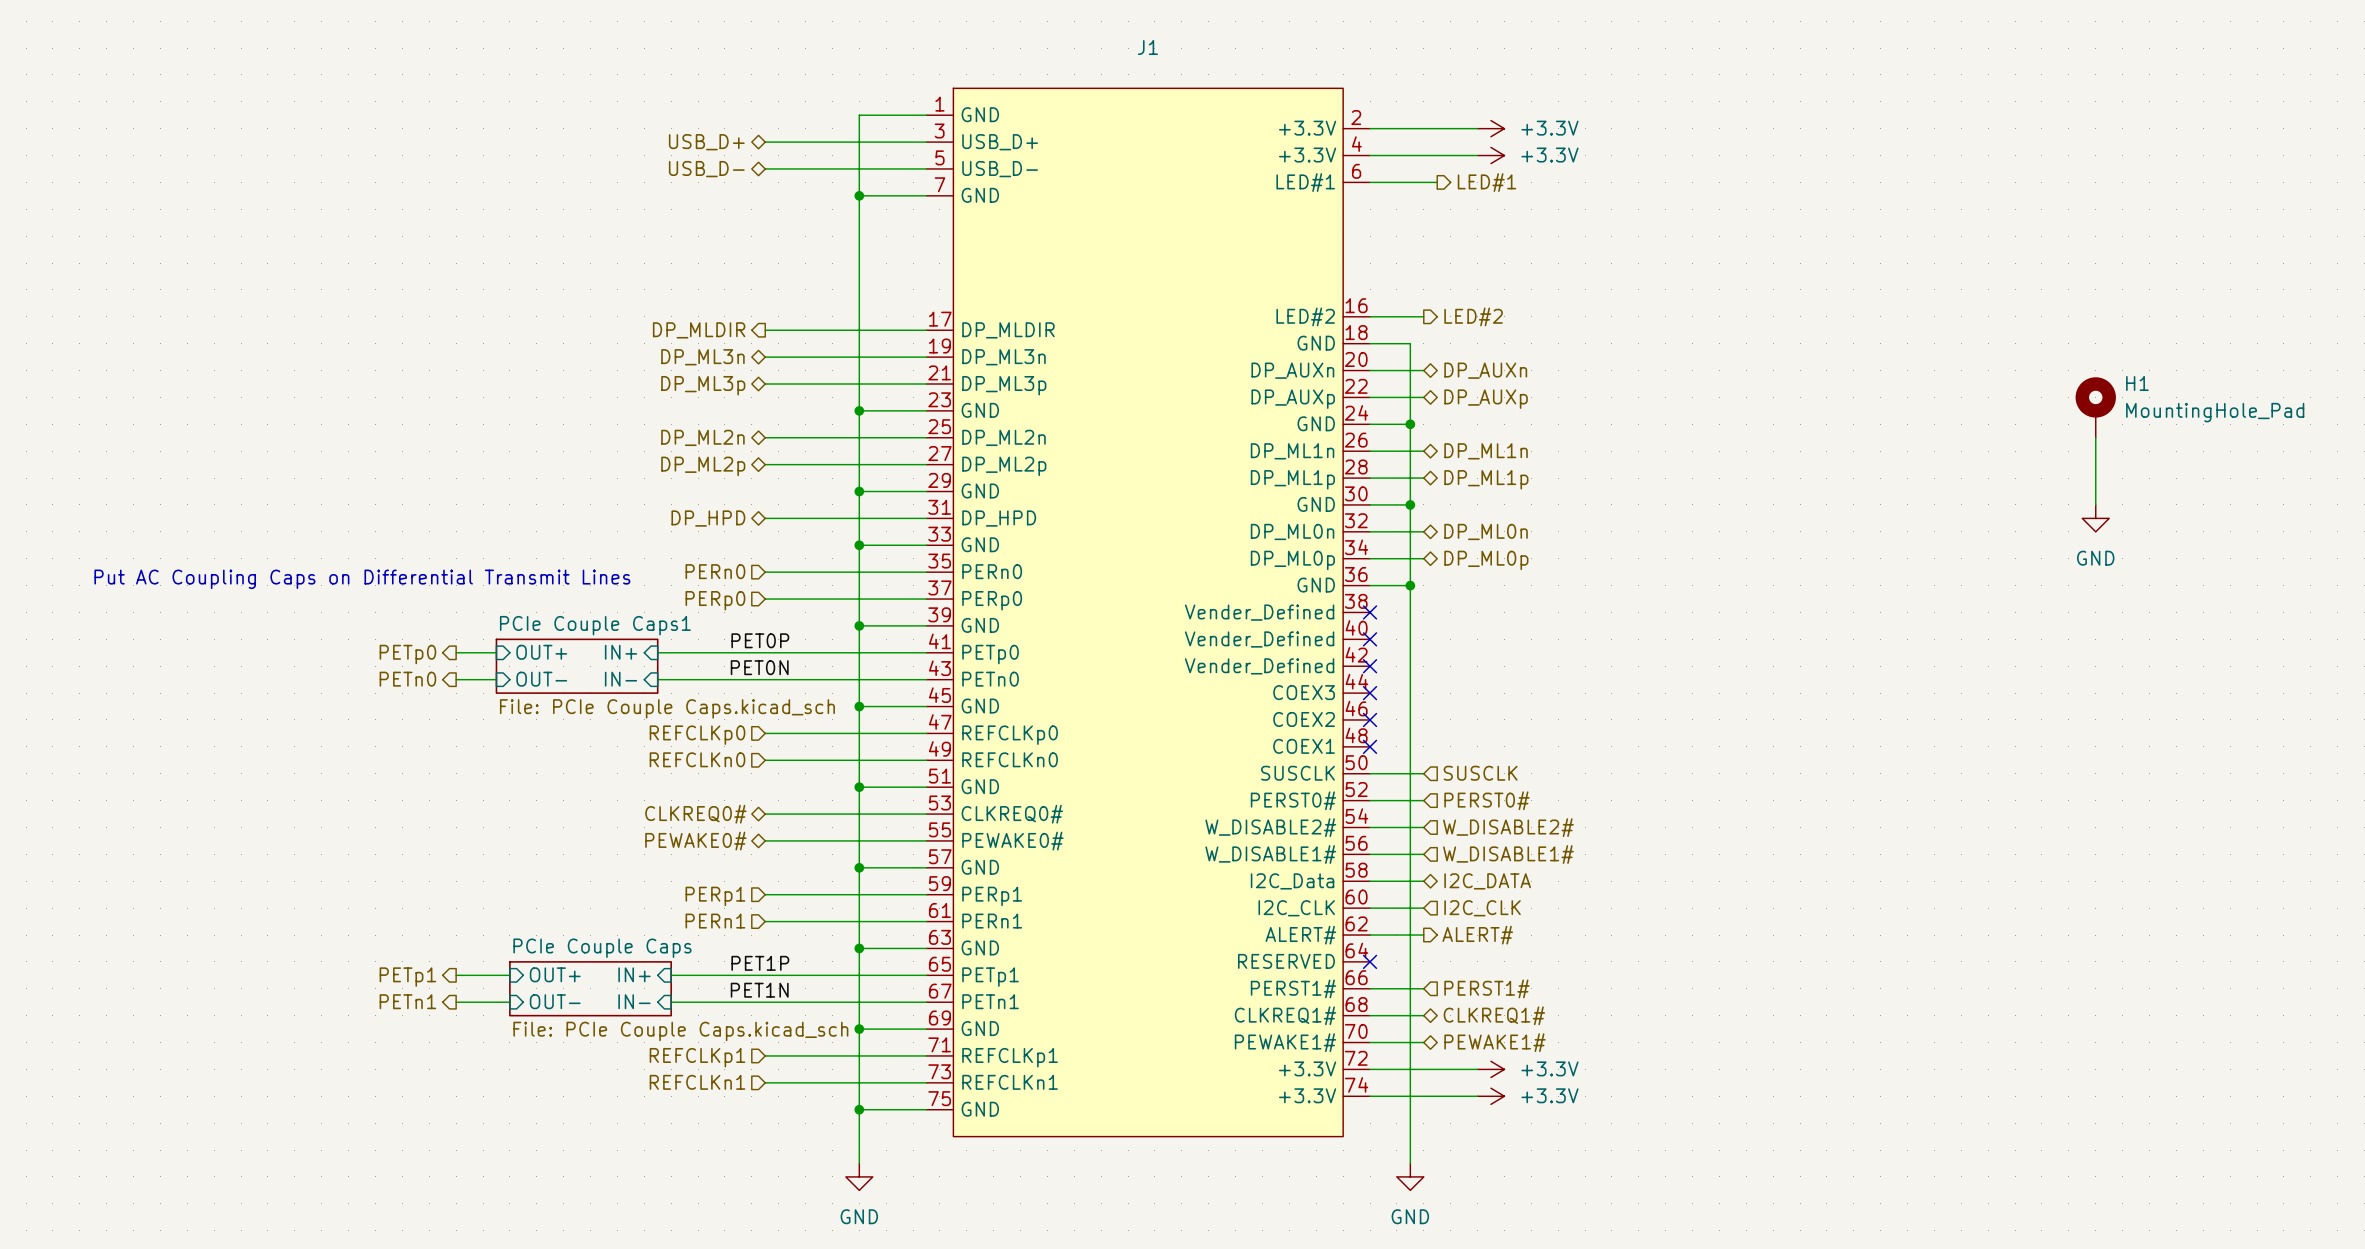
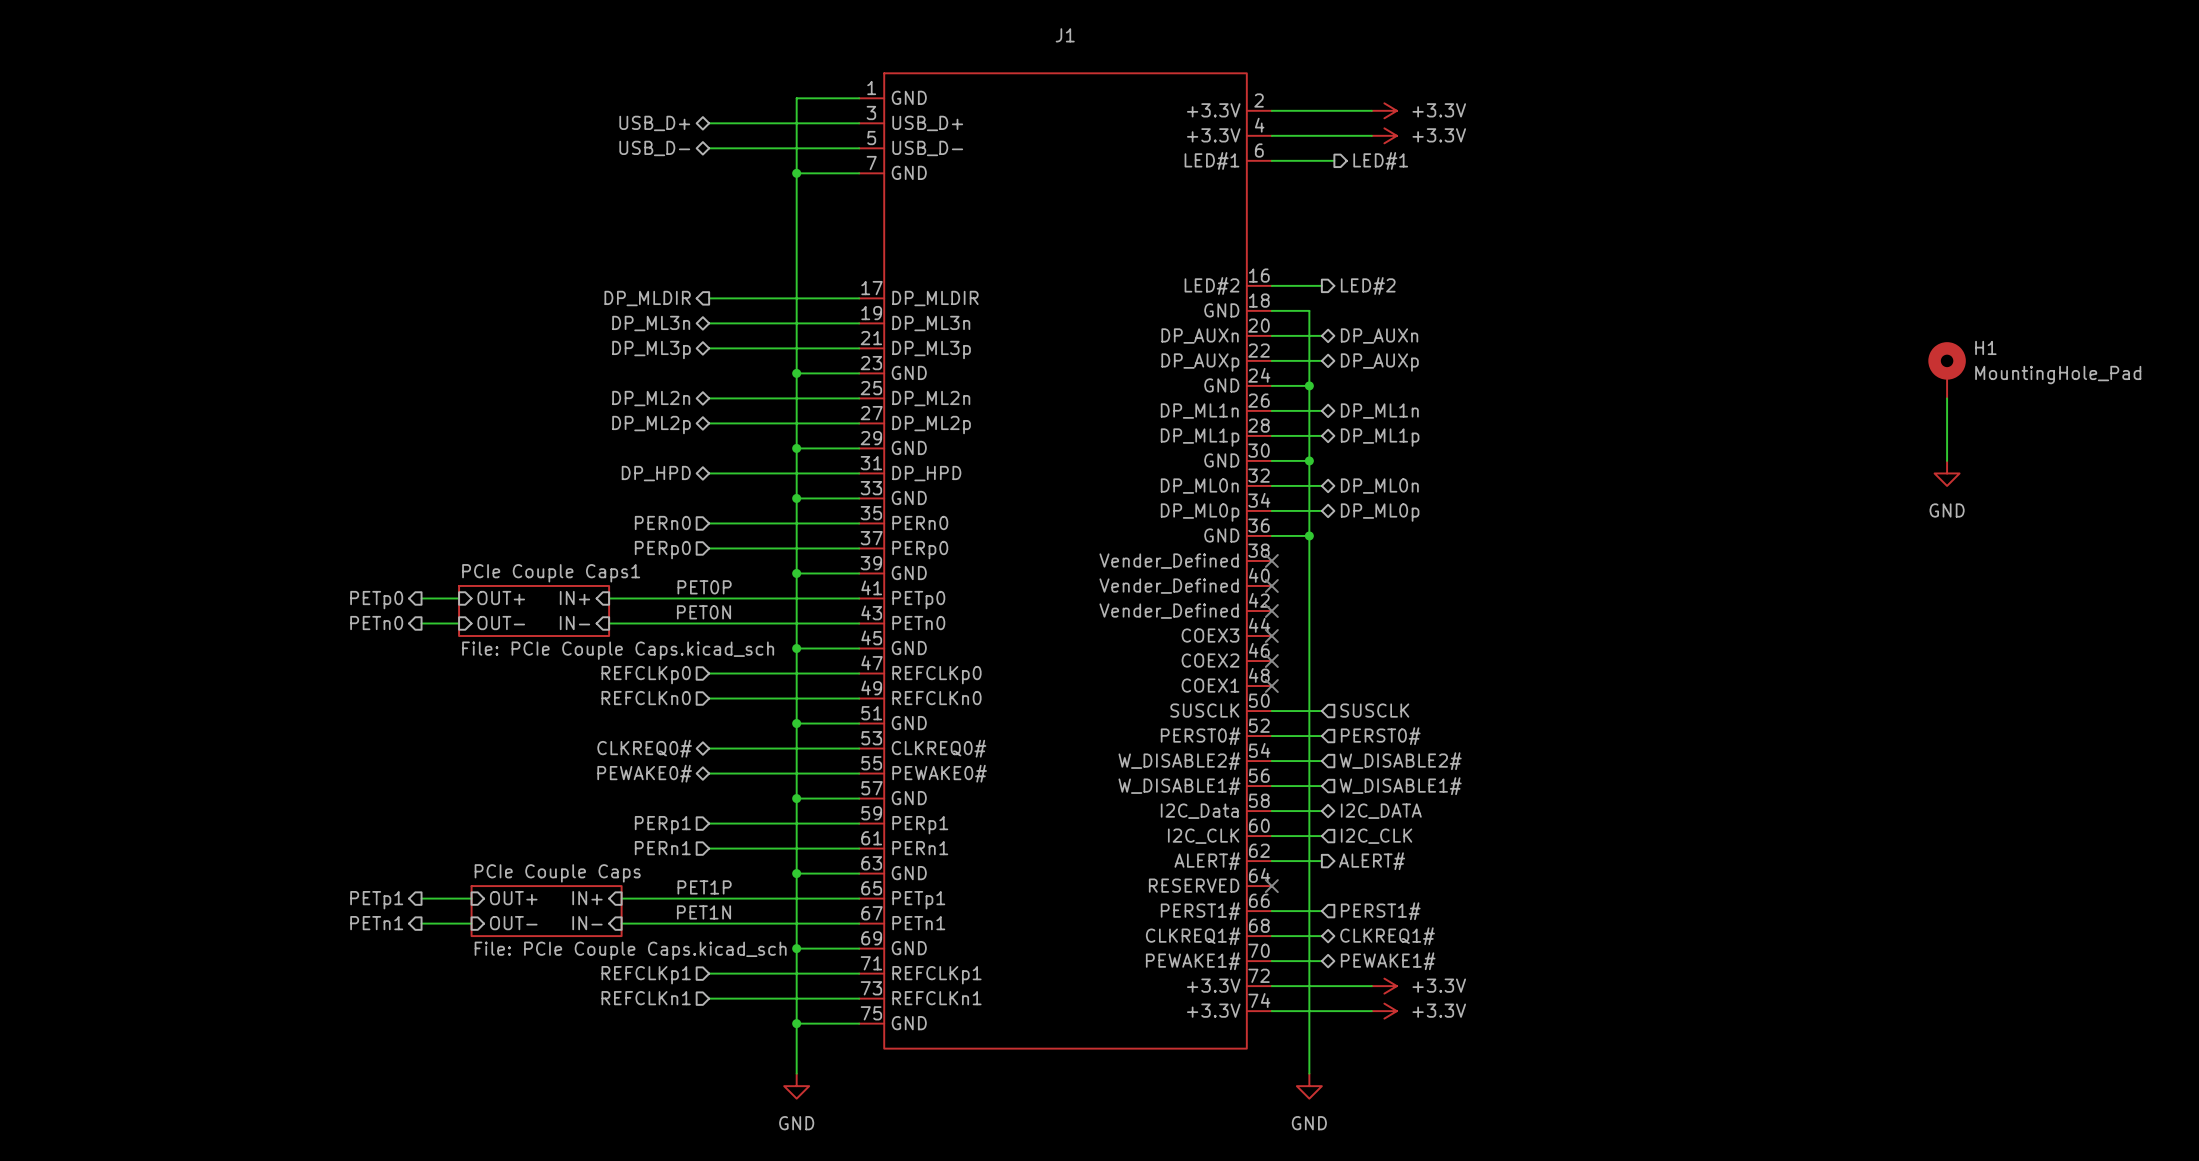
text: Put AC Coupling Caps on Differential Transmit Lines (362, 579) -> none

